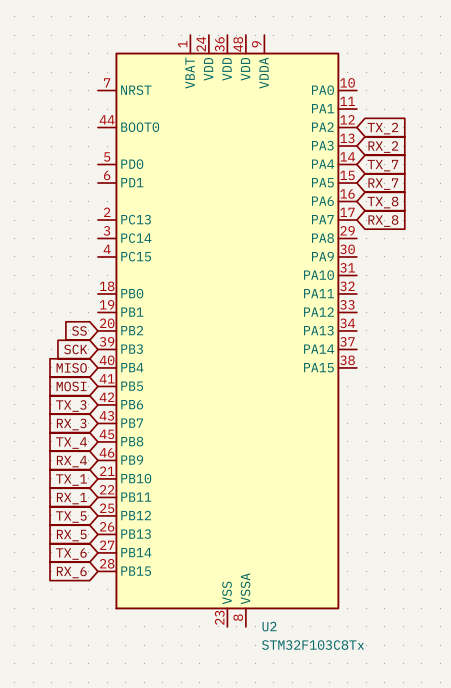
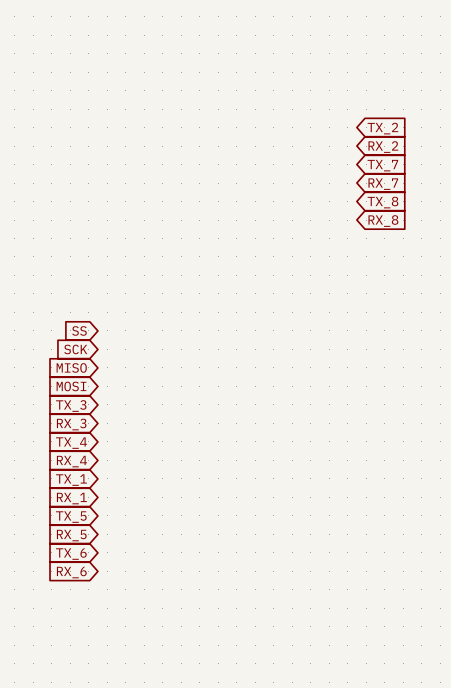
U2: STM32F103C8Tx (227, 330) -> none

